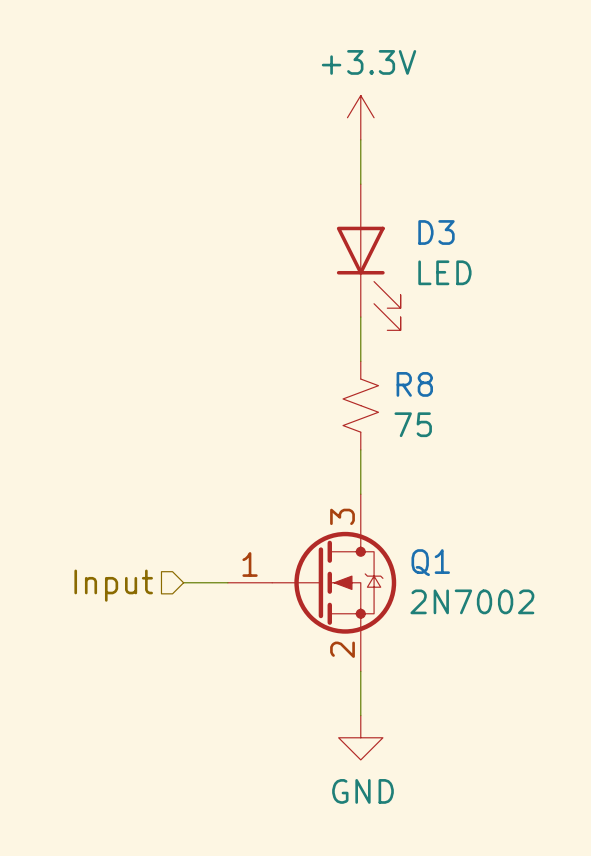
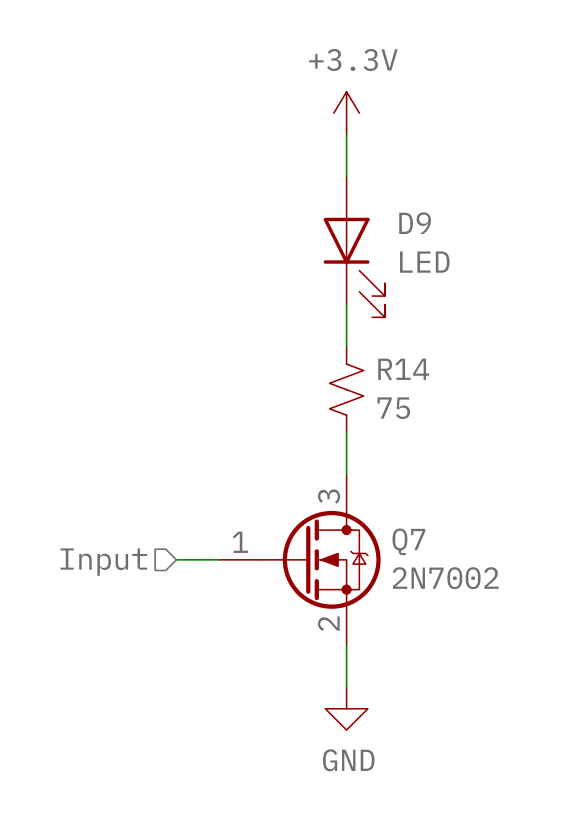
D3 name: D3 (436, 232) -> D9 (415, 223)
R8 name: R8 (414, 384) -> R14 (403, 369)
Q1 name: Q1 (430, 562) -> Q7 (408, 541)

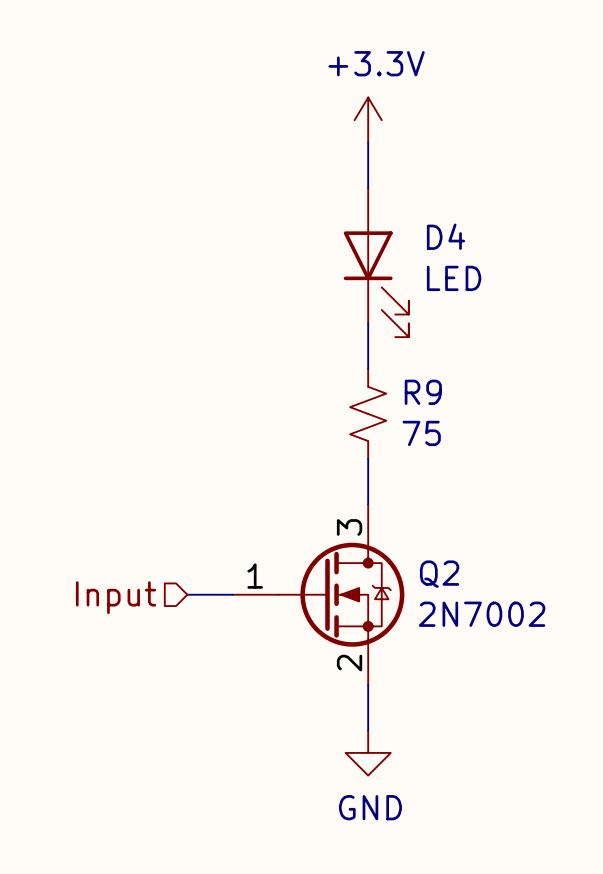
D9 name: D9 (415, 223) -> D4 (445, 236)
R14 name: R14 (403, 369) -> R9 (423, 392)
Q7 name: Q7 (408, 541) -> Q2 (439, 574)

